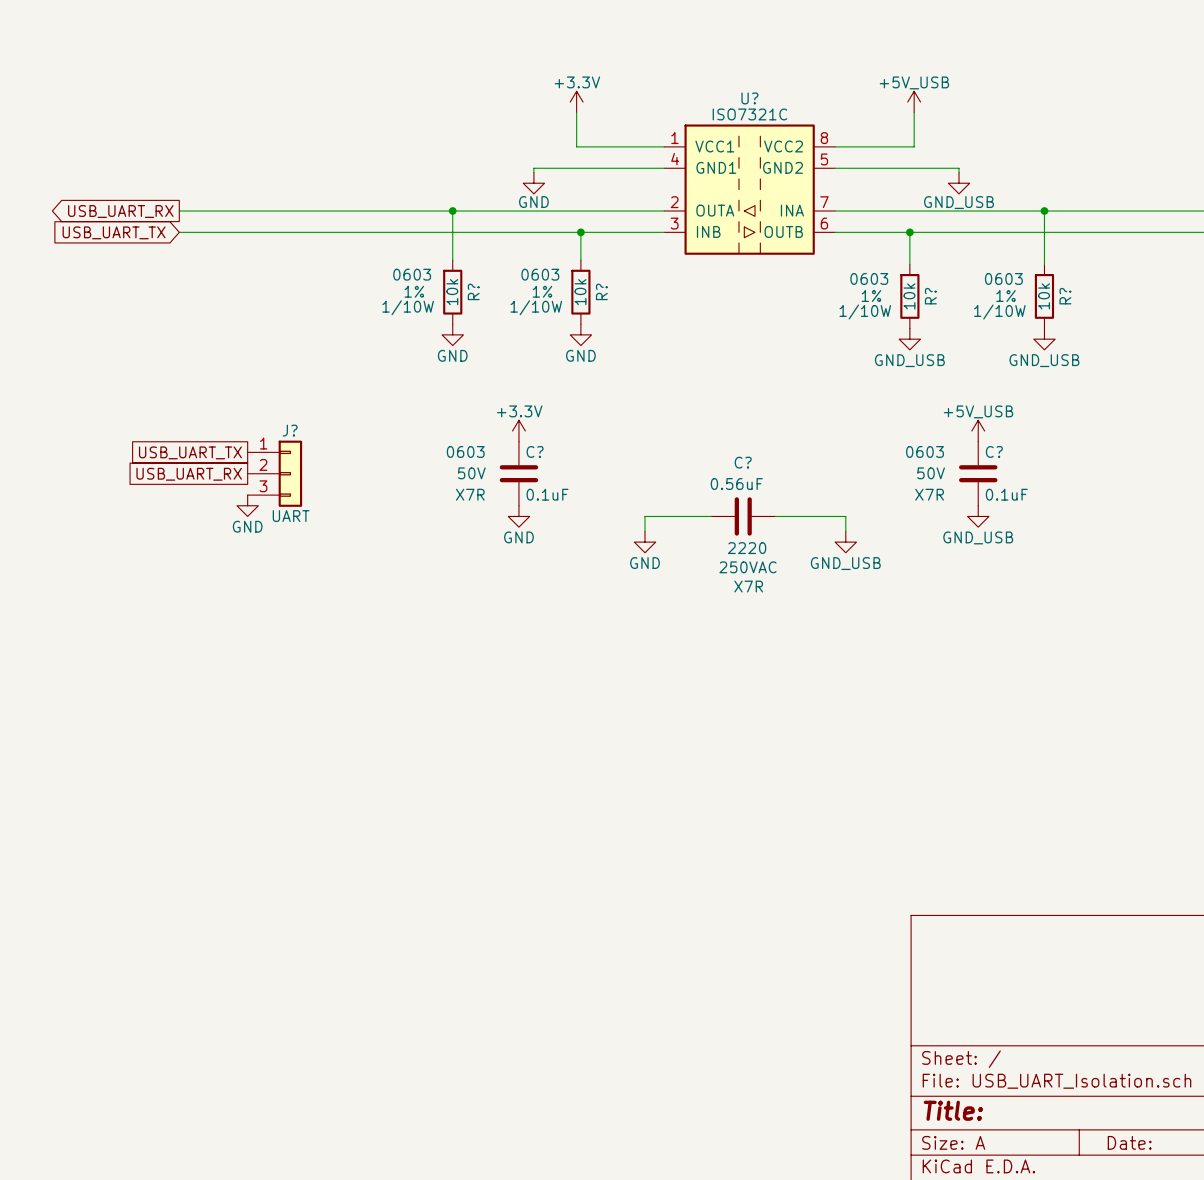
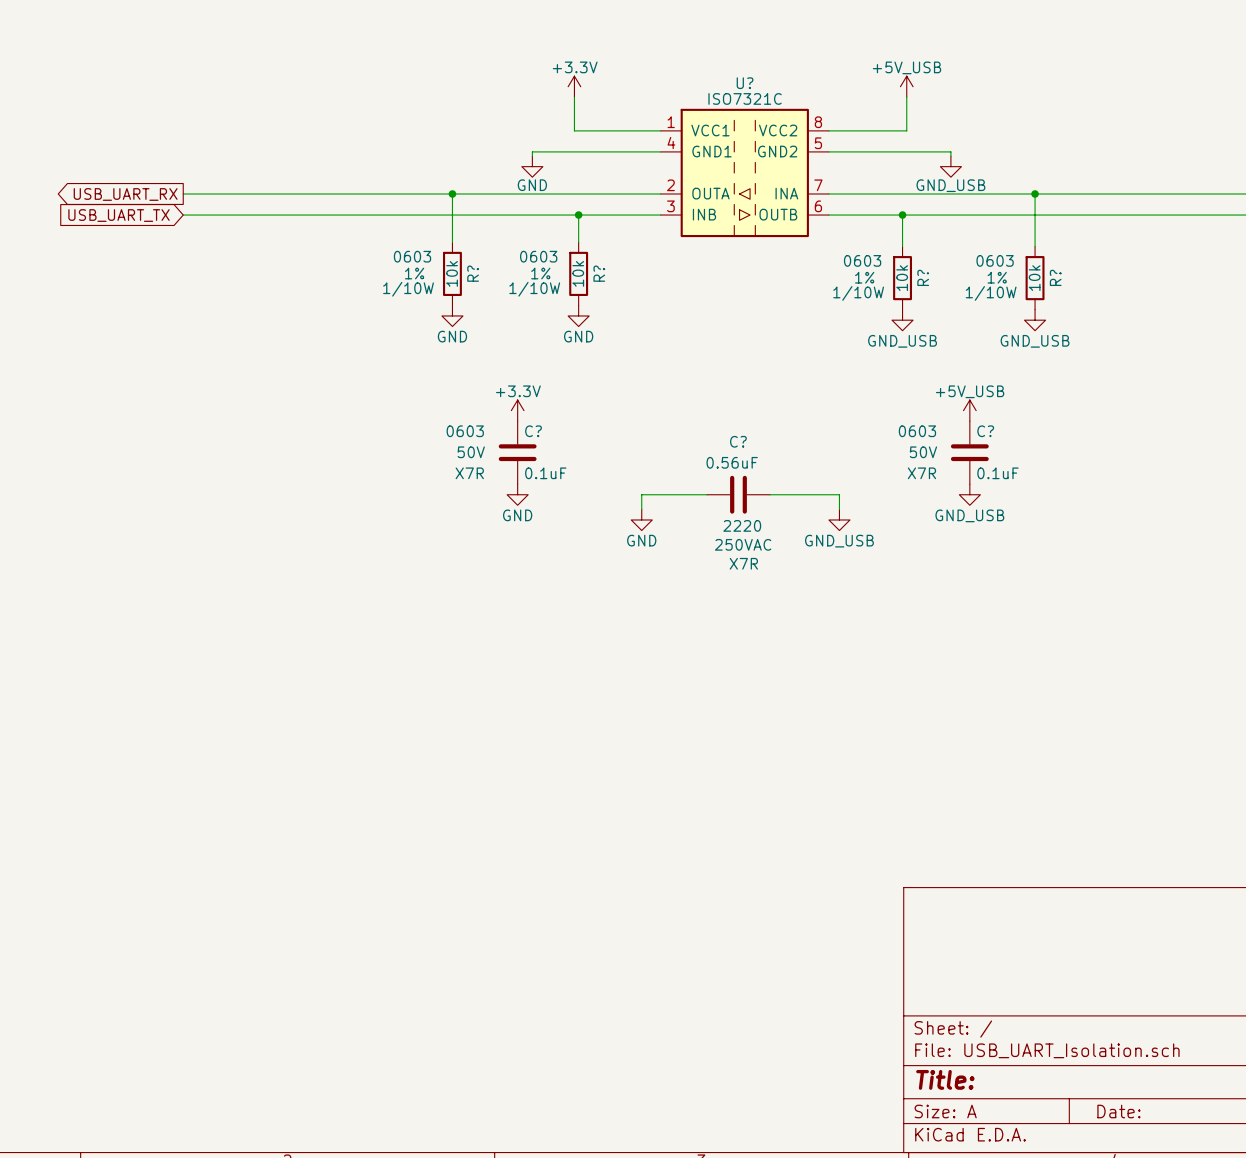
global label: USB_UART_TX (190, 452) -> none
J?: UART (274, 473) -> none
global label: USB_UART_RX (189, 474) -> none
power symbol: GND (247, 505) -> none

